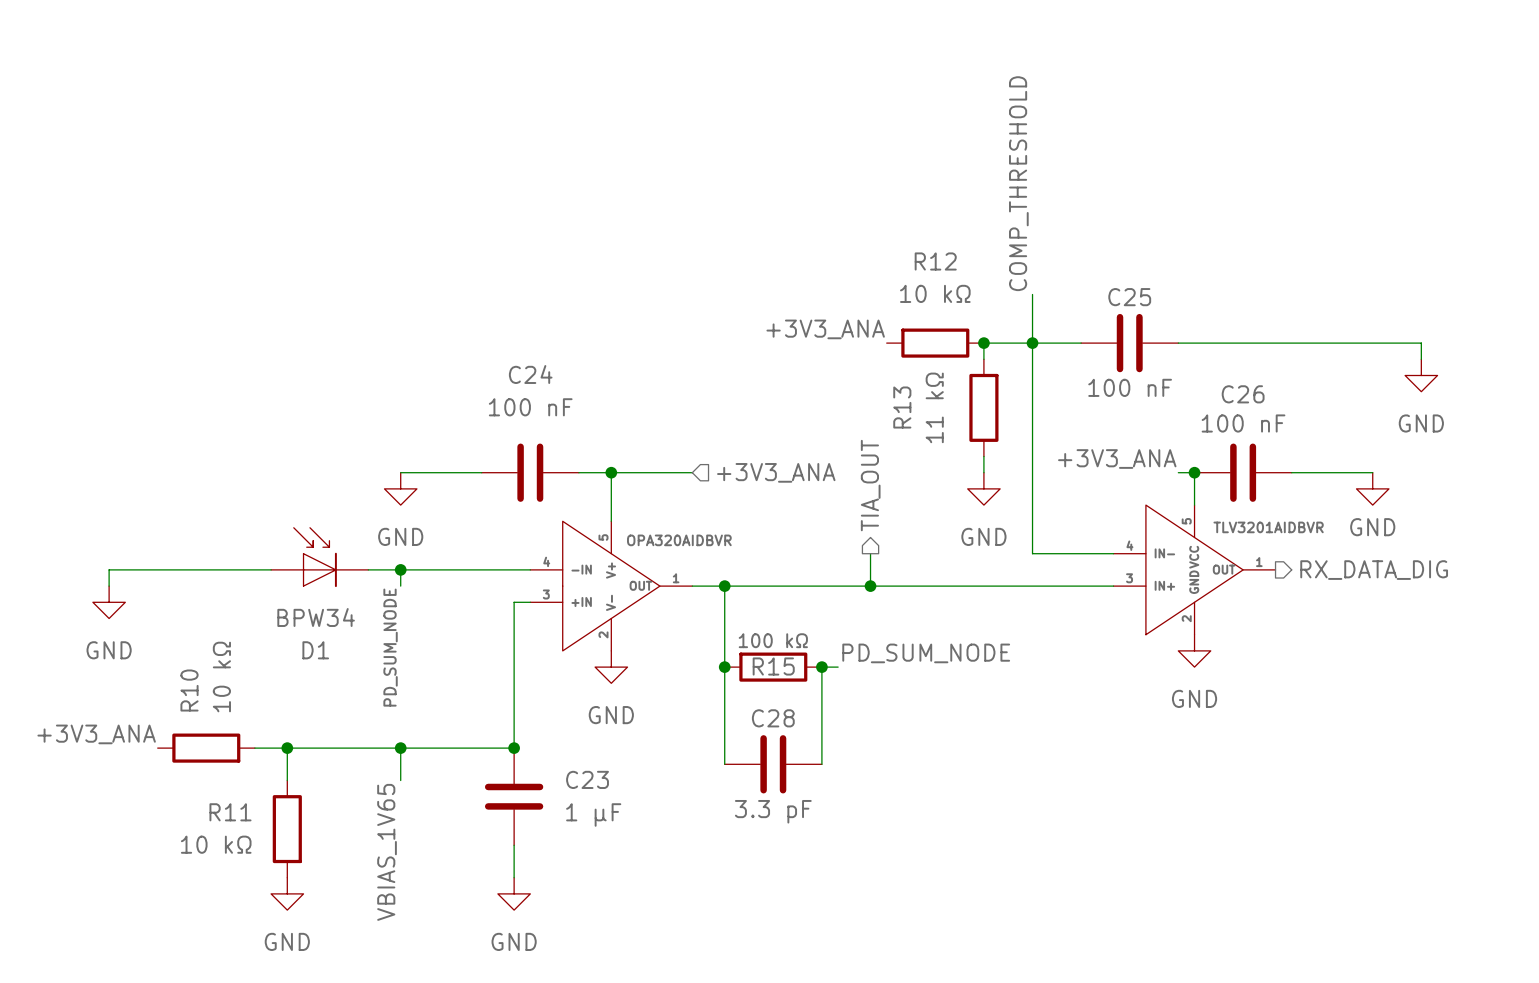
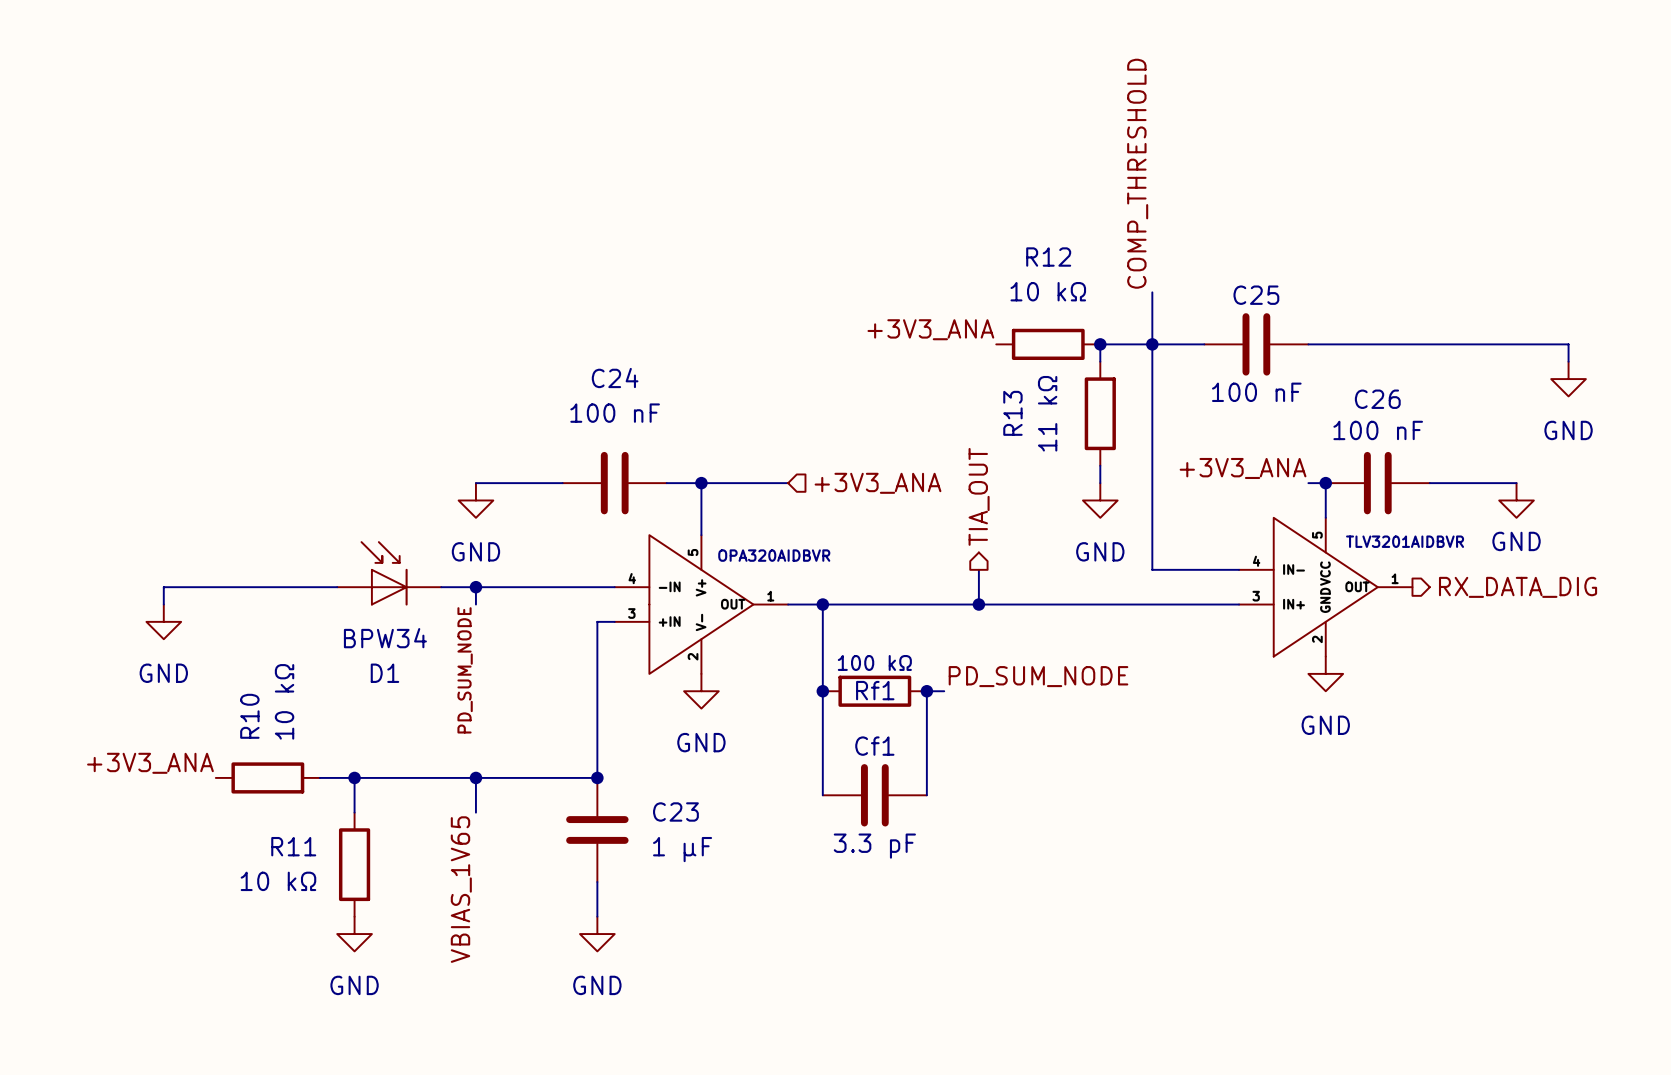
R15 name: R15 (773, 666) -> Rf1 (875, 690)
C28 name: C28 (773, 718) -> Cf1 (874, 746)

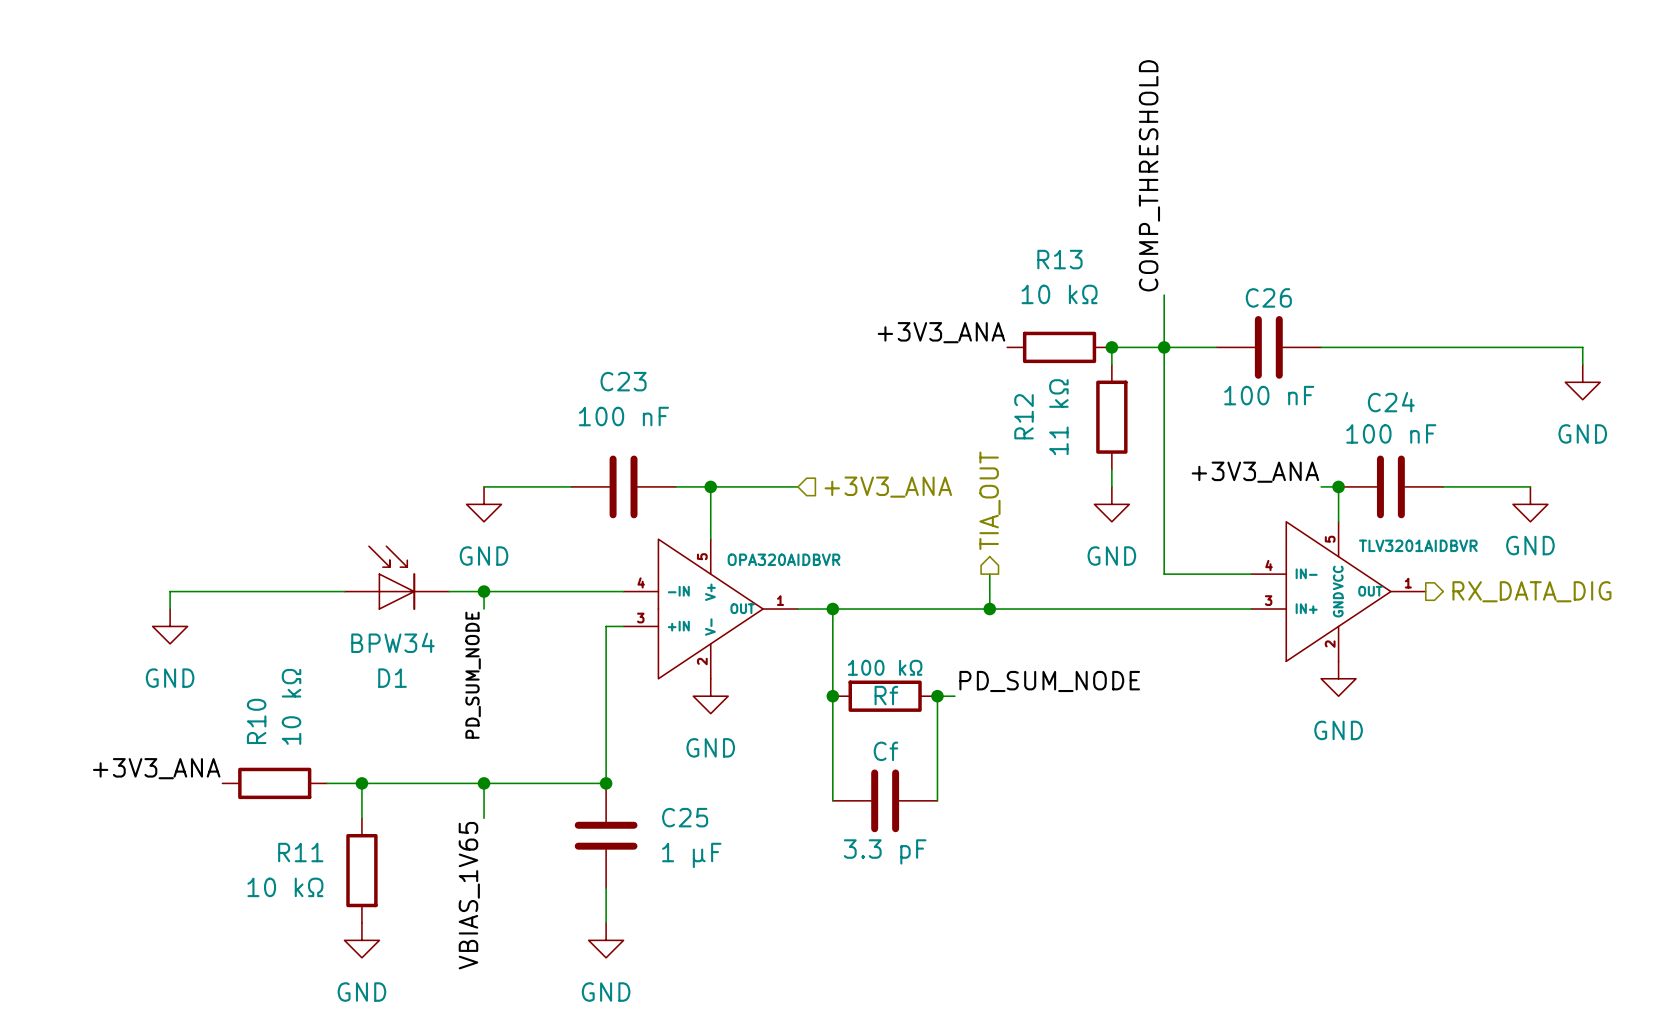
R12 name: R12 (1048, 257) -> R13 (1059, 259)
C25 name: C25 (1256, 295) -> C26 (1268, 297)
C24 name: C24 (615, 378) -> C23 (623, 381)
C26 name: C26 (1377, 399) -> C24 (1391, 402)
R13 name: R13 (1012, 413) -> R12 (1024, 416)
Rf1 name: Rf1 (875, 690) -> Rf (886, 695)
Cf1 name: Cf1 (874, 746) -> Cf (885, 751)
C23 name: C23 (675, 811) -> C25 (685, 817)

